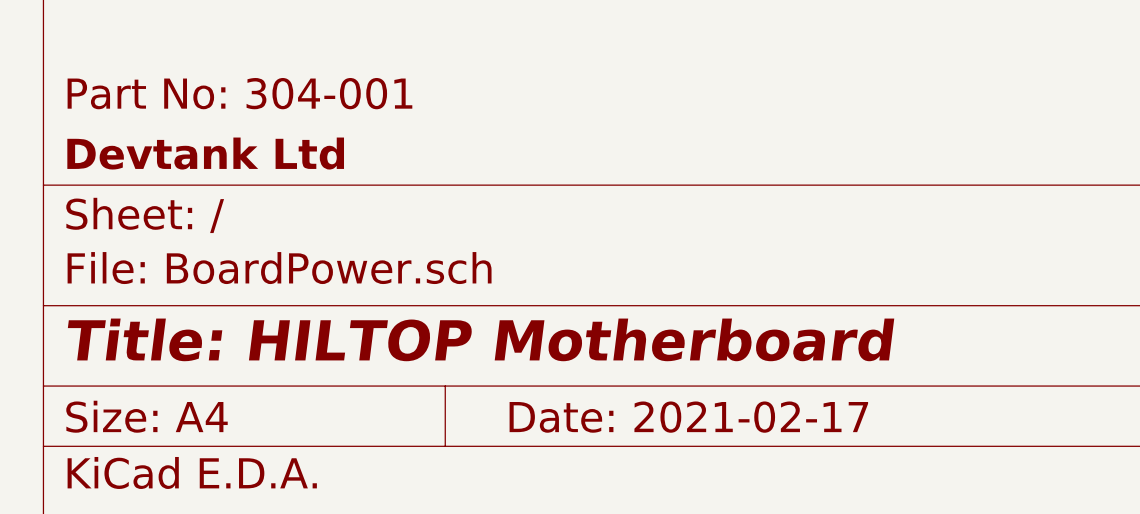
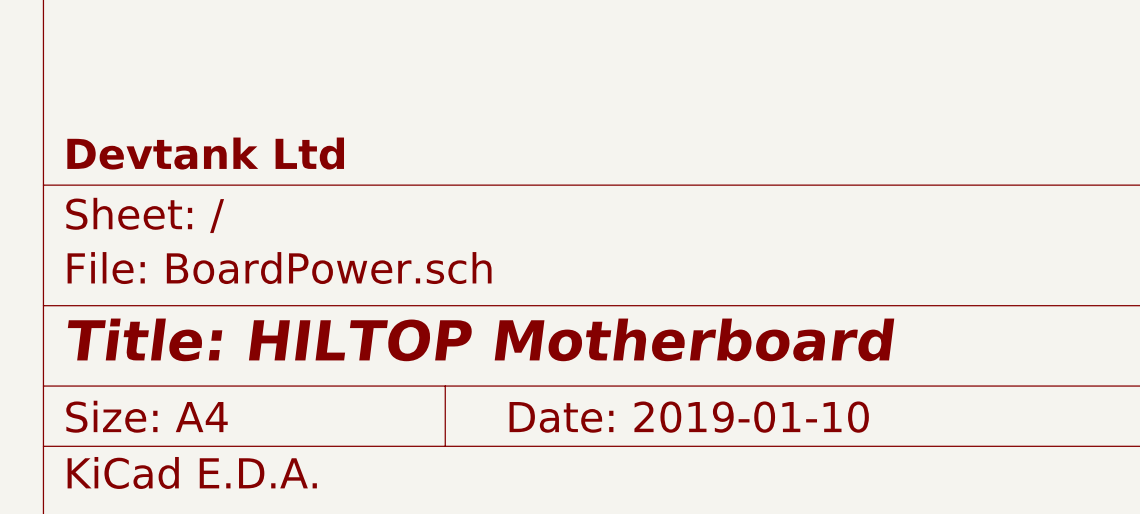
title block: Part No: 304-001 (239, 93) -> none
title block: Date: 2021-02-17 (688, 417) -> Date: 2019-01-10 (689, 417)

